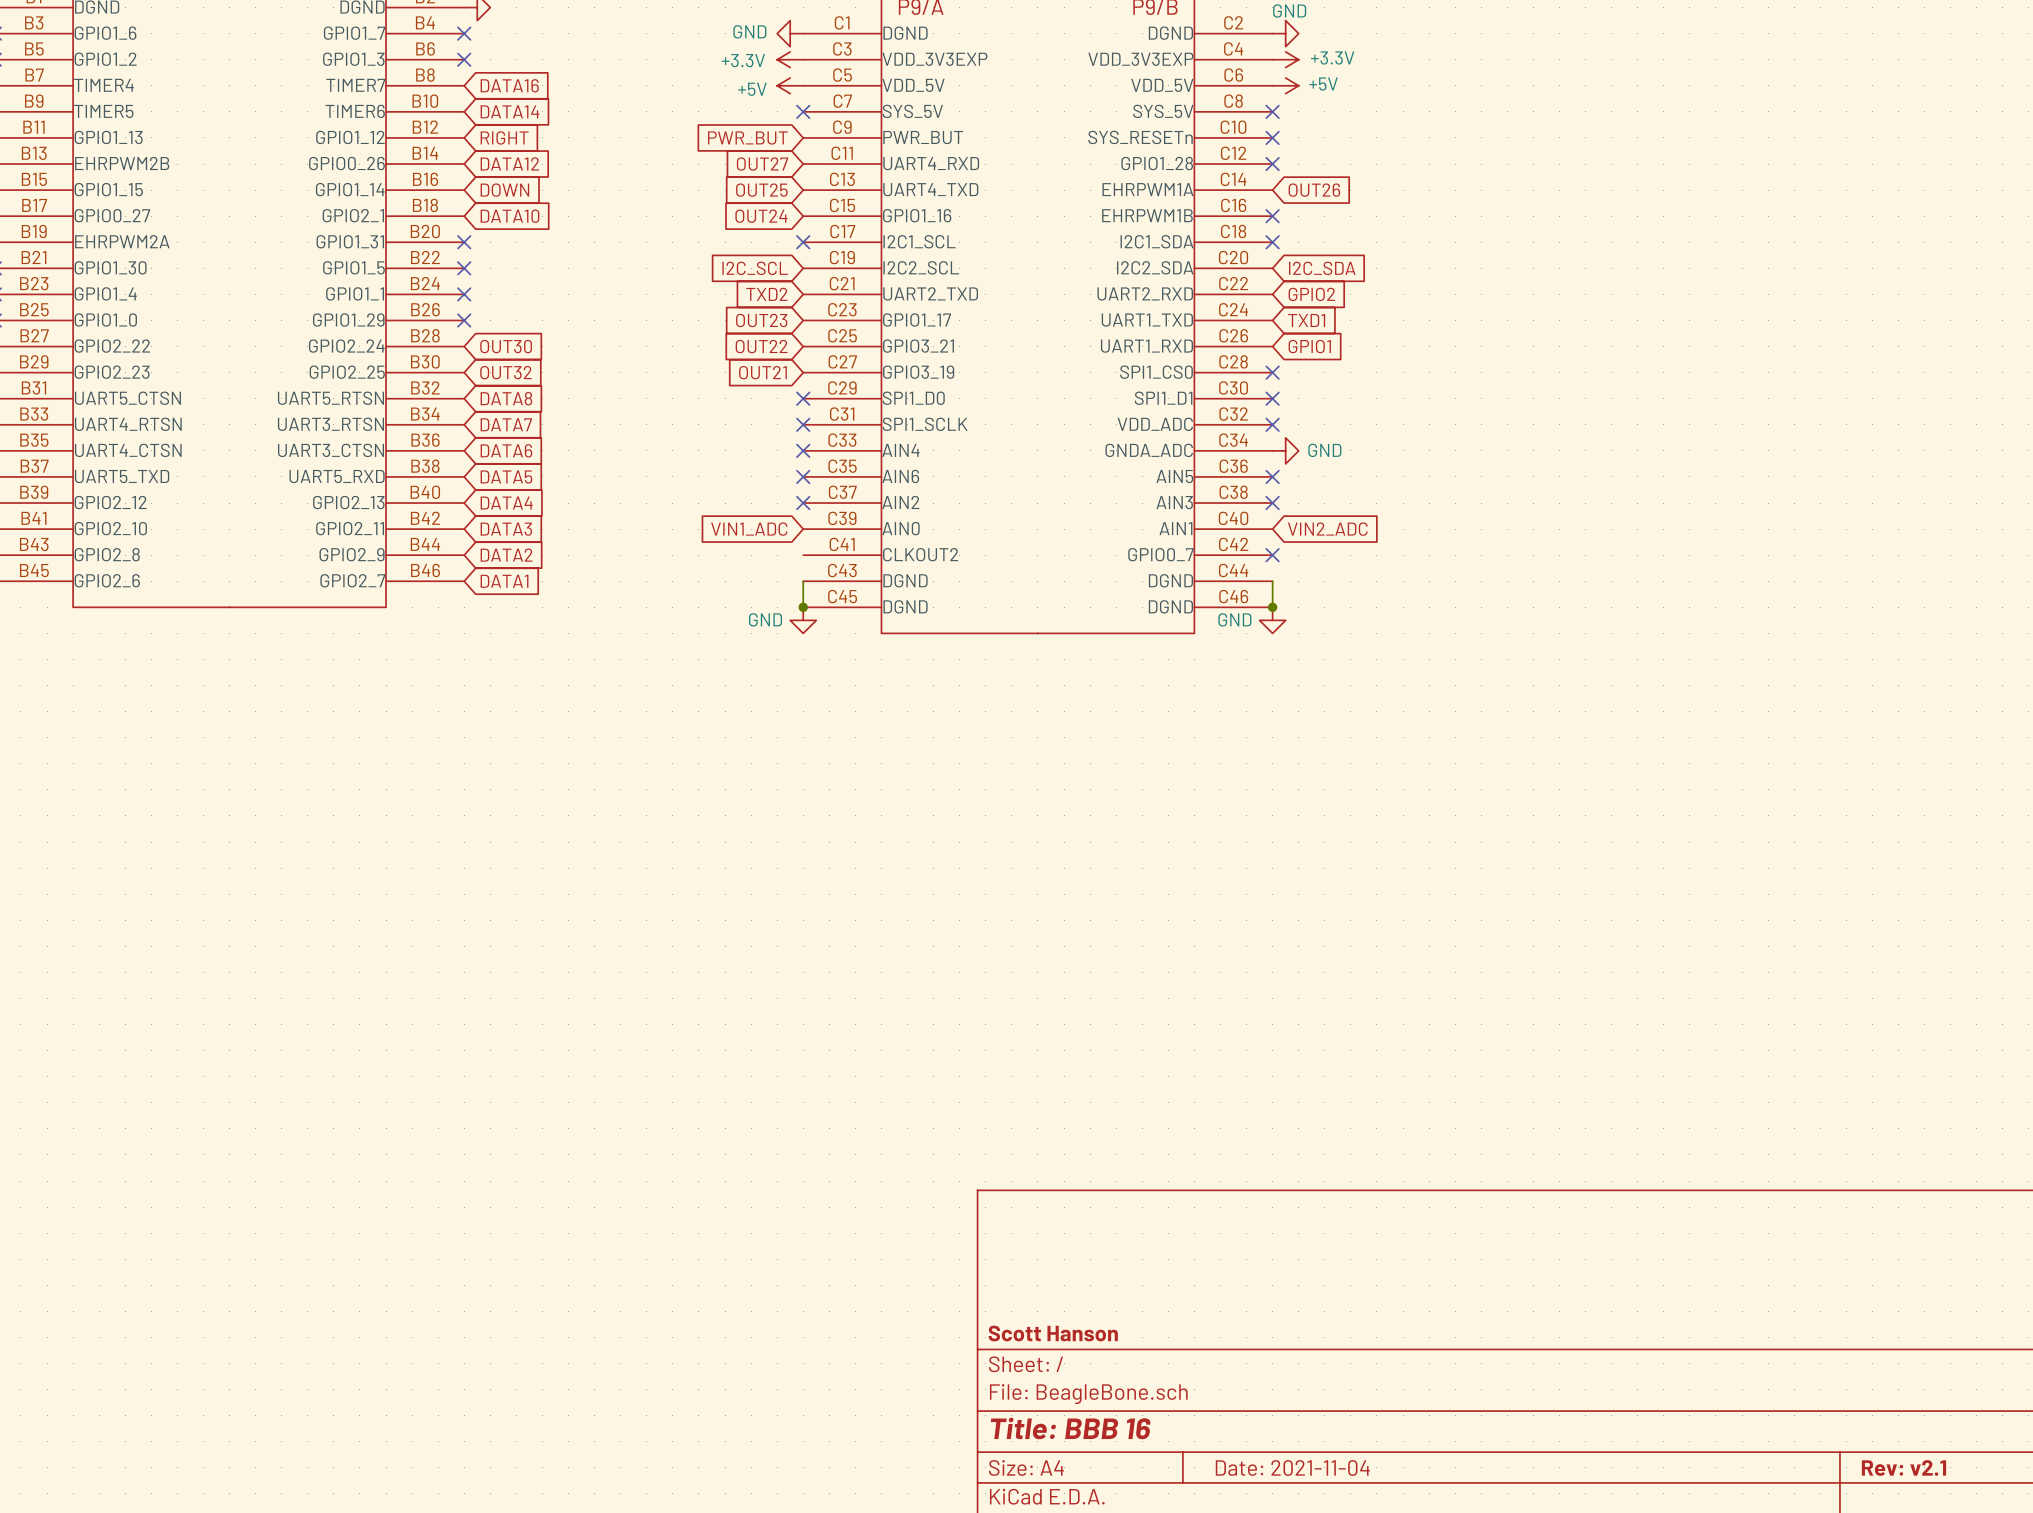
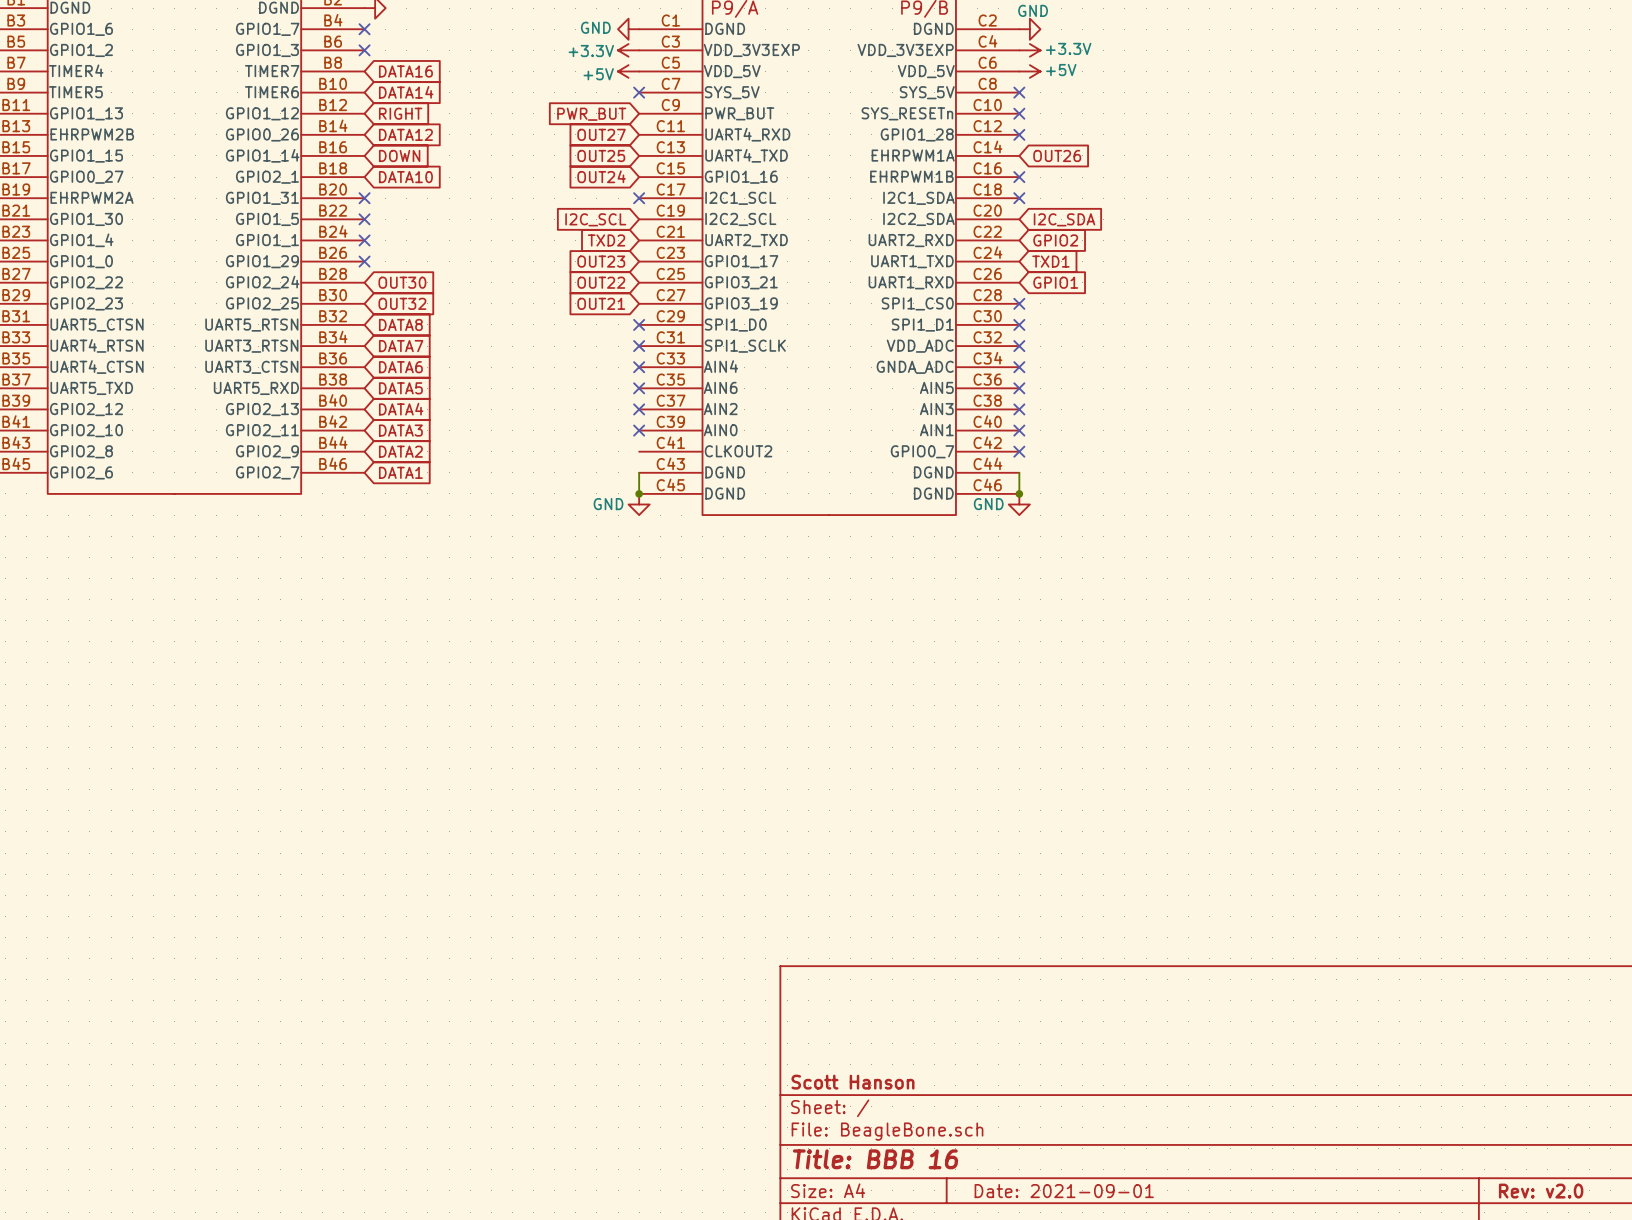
no-connect mark: none -> (1019, 367)
power symbol: GND (1285, 450) -> none
global label: VIN1_ADC (749, 529) -> none
no-connect mark: none -> (639, 430)
no-connect mark: none -> (1019, 430)
global label: VIN2_ADC (1327, 529) -> none
title block: Date: 2021-11-04 (1292, 1467) -> Date: 2021-09-01 (1064, 1191)
title block: Rev: v2.1 (1903, 1467) -> Rev: v2.0 (1541, 1191)

